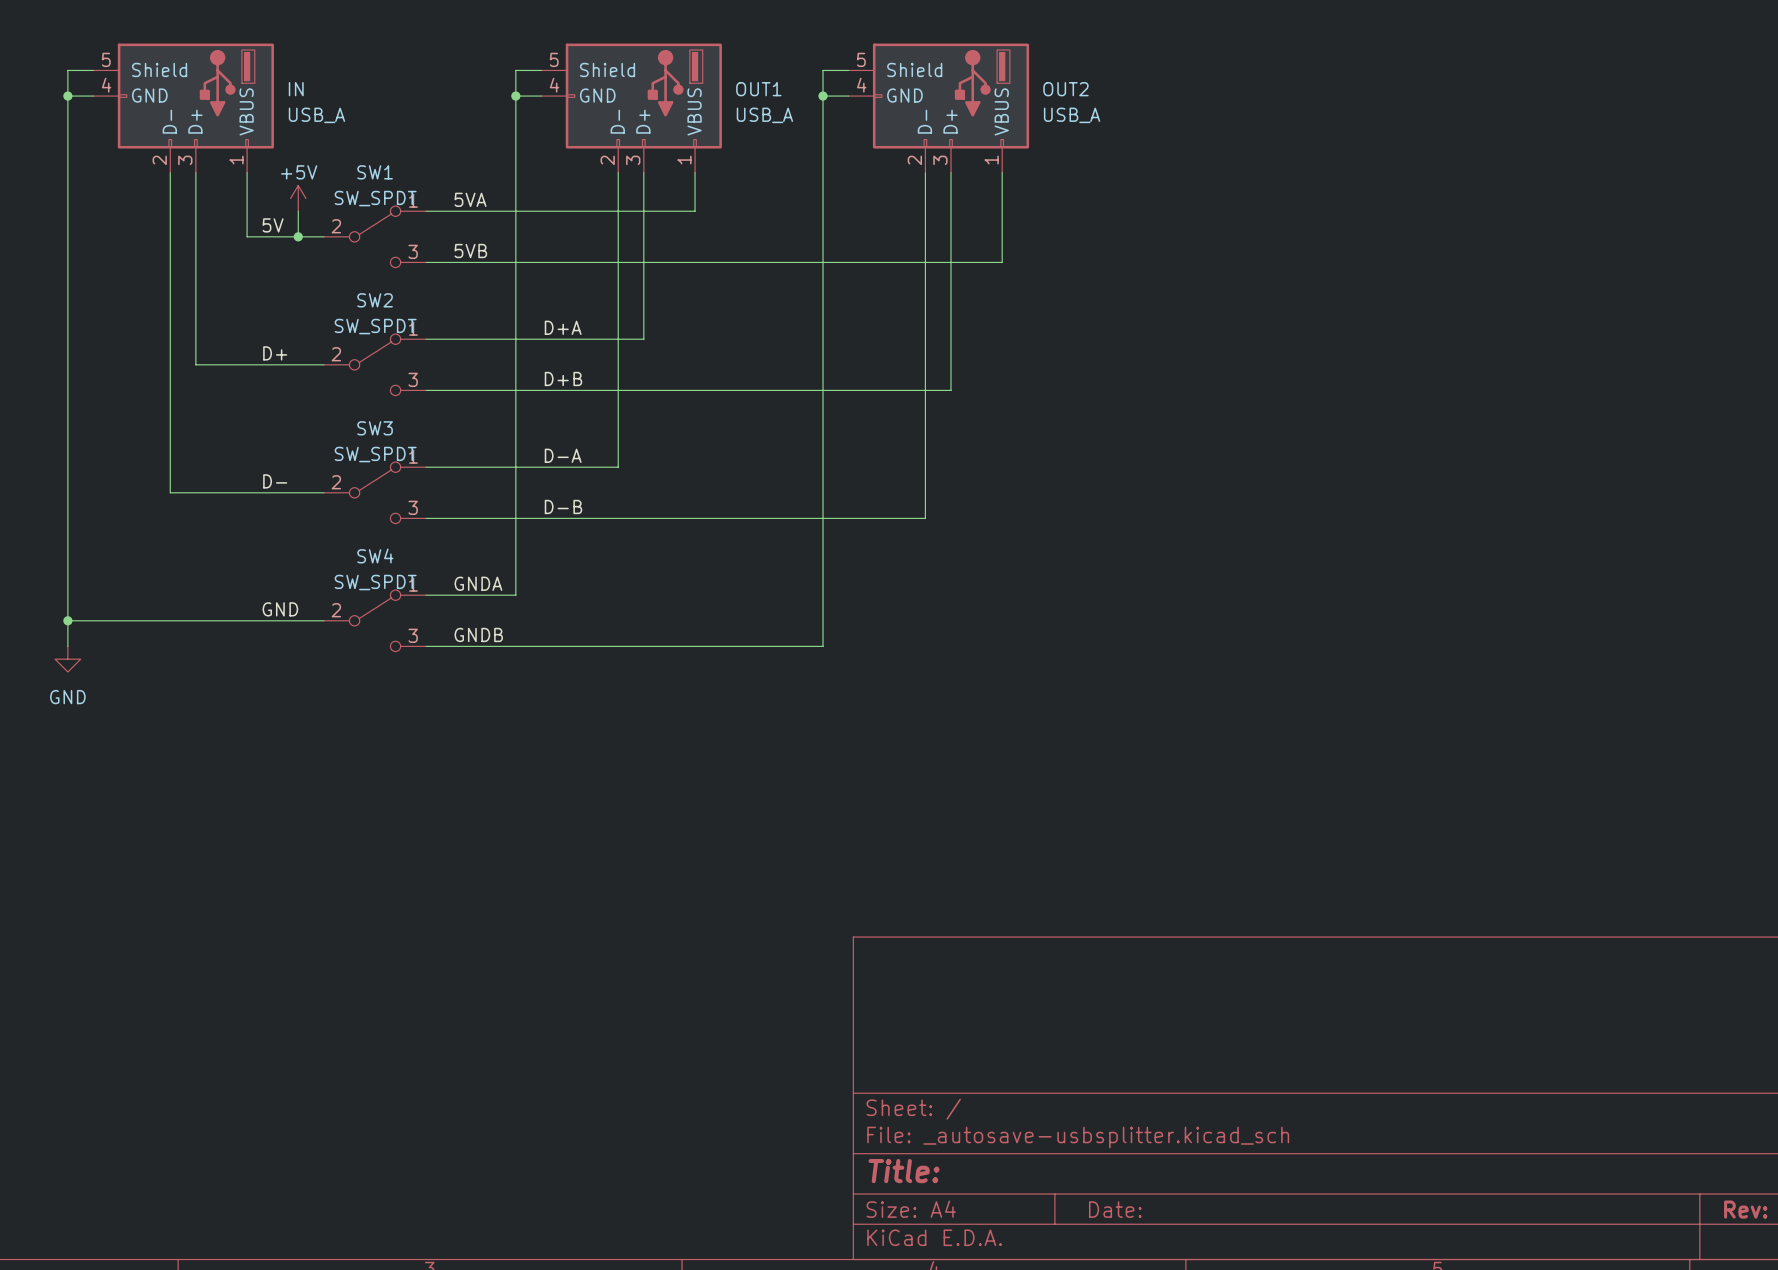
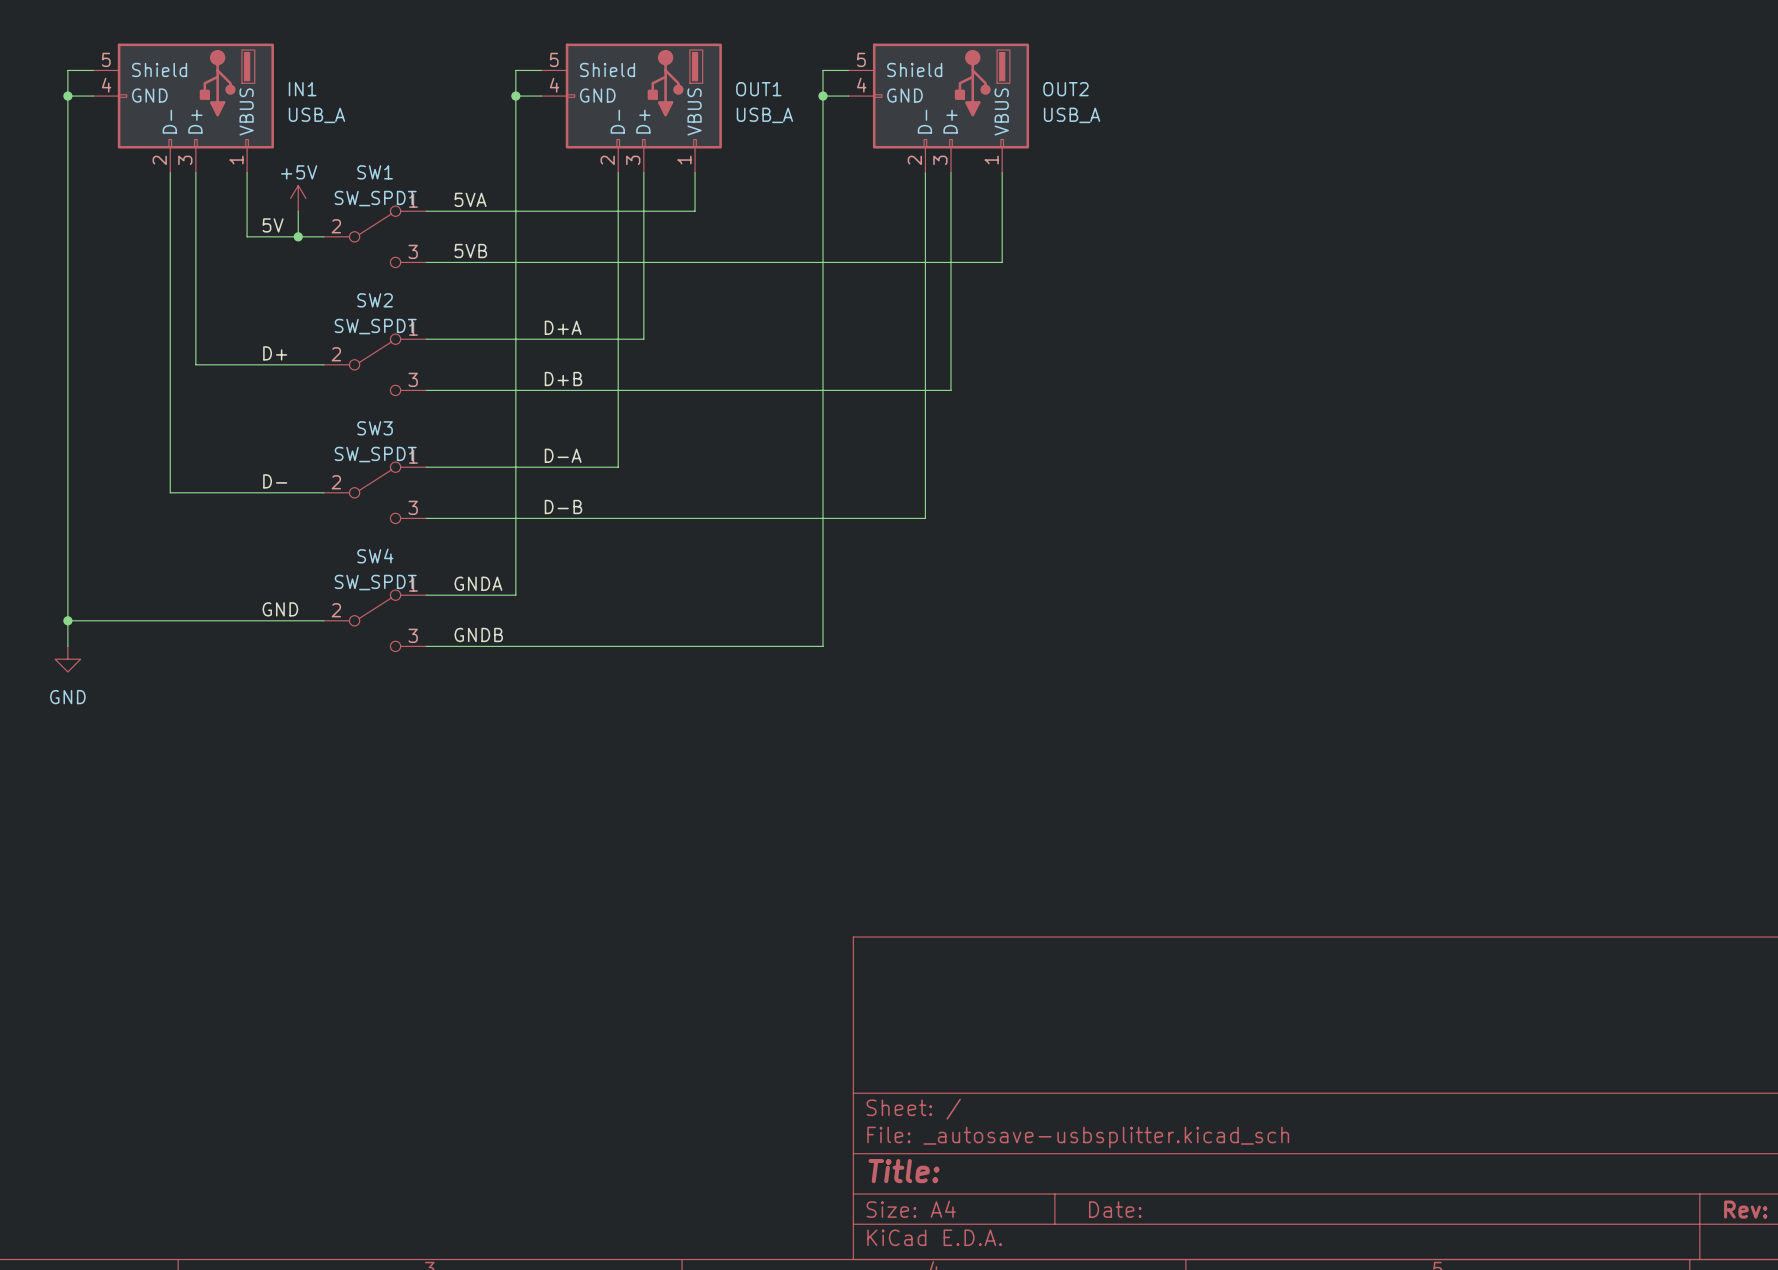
IN name: IN (296, 89) -> IN1 (302, 89)

